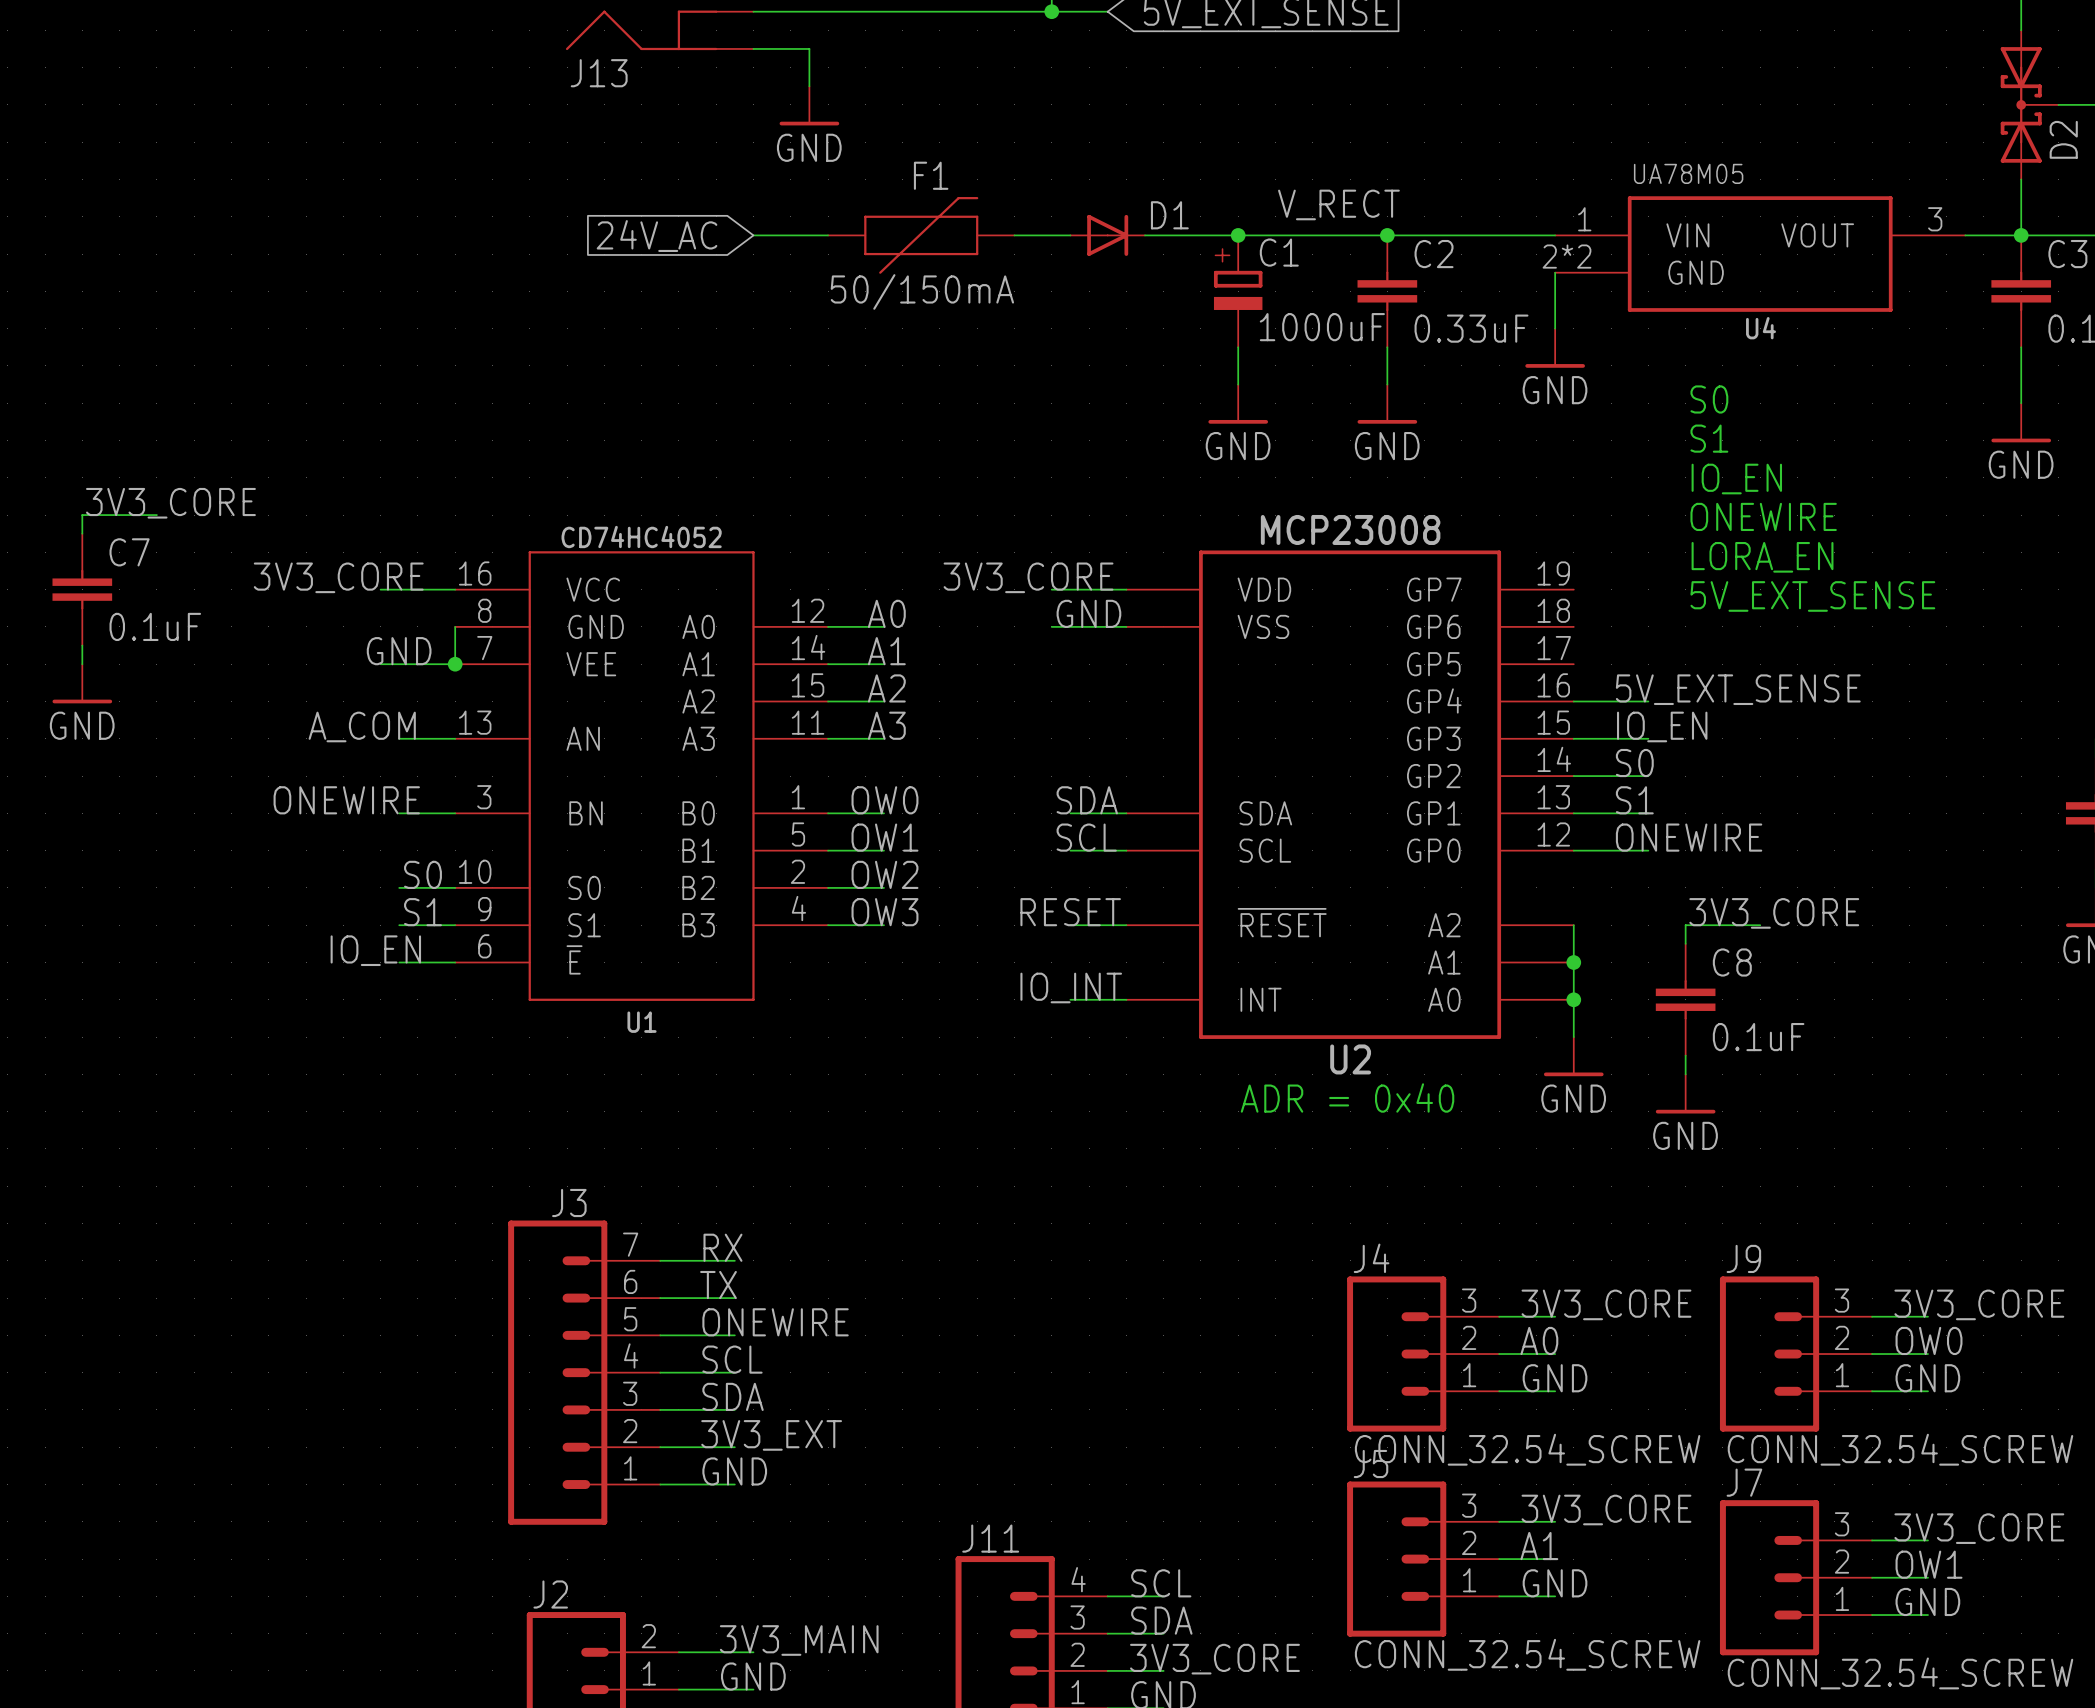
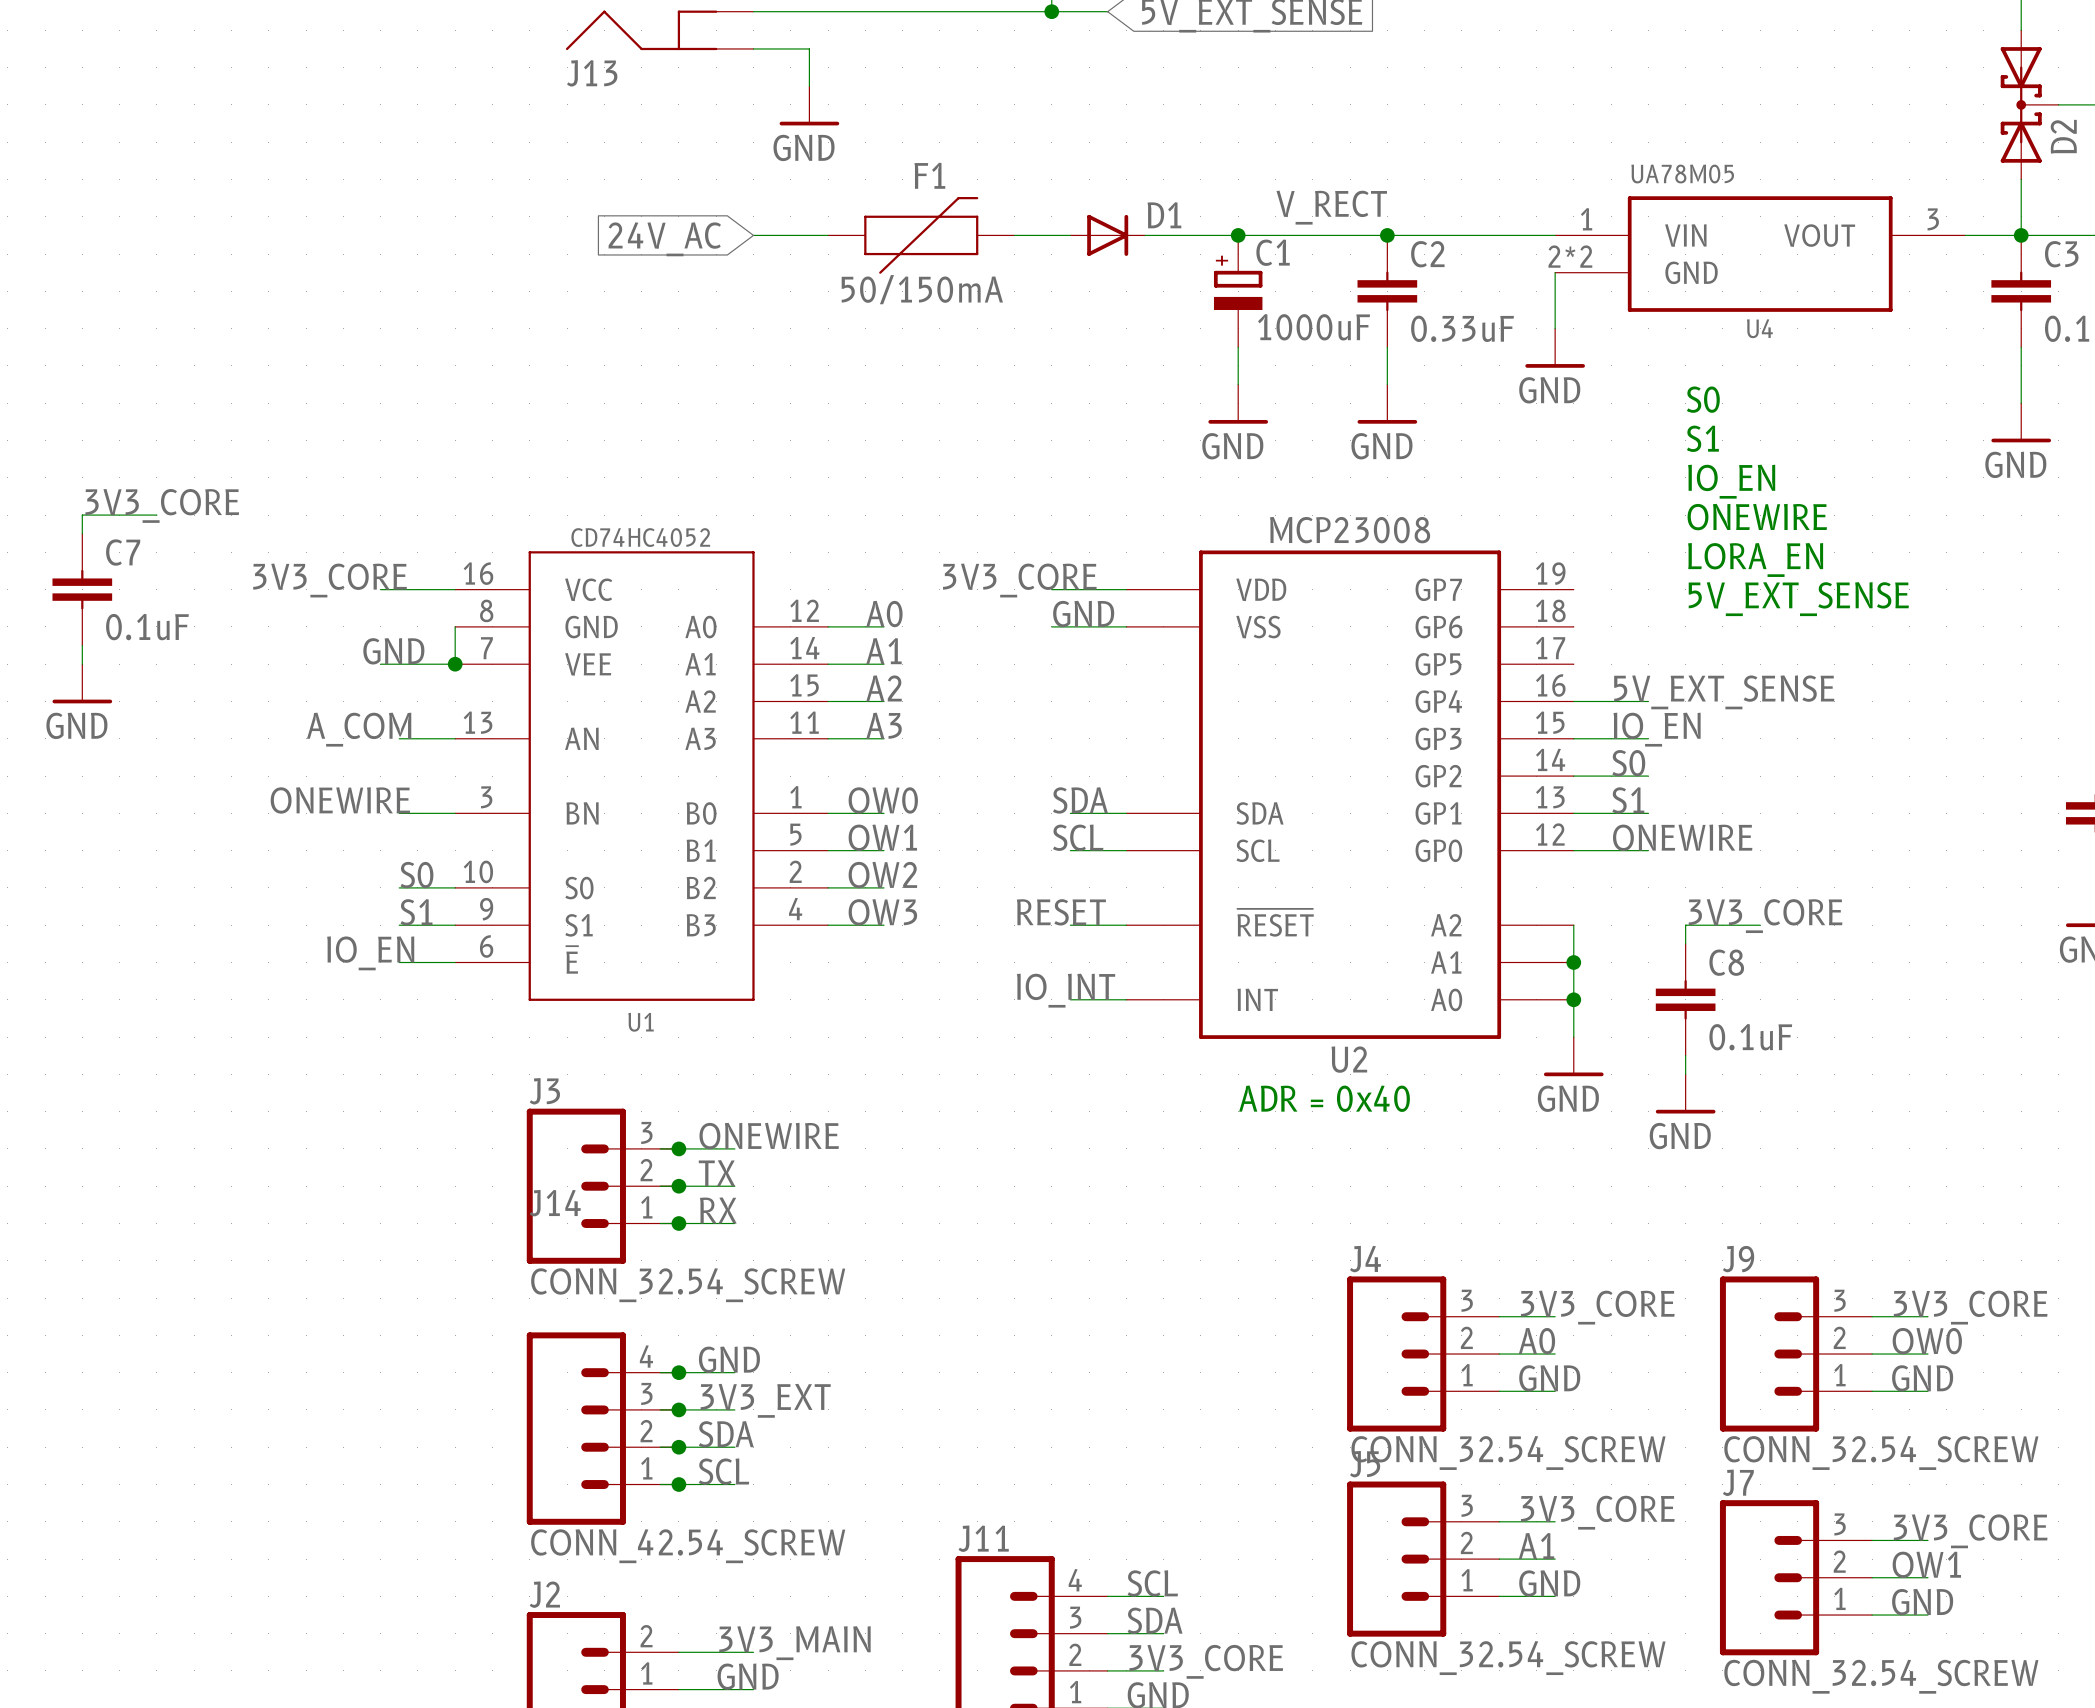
junction: none -> (678, 1148)
junction: none -> (678, 1186)
J3 name position: J3 (569, 1203) -> J3 (544, 1091)
J3 symbol: [508, 1220, 661, 1525] -> [526, 1108, 679, 1264]
junction: none -> (678, 1223)
label position: RX (722, 1247) -> RX (718, 1210)
wire: (660, 1260) (734, 1260) -> (660, 1148) (734, 1148)
J3 value: none -> CONN_32.54_SCREW (688, 1285)
label position: TX (718, 1285) -> TX (716, 1173)
wire: (660, 1298) (734, 1298) -> (660, 1186) (734, 1186)
label position: ONEWIRE (775, 1322) -> ONEWIRE (769, 1136)
wire: (660, 1335) (734, 1335) -> (660, 1223) (734, 1223)
label: SCL (732, 1359) -> GND (729, 1359)
junction: none -> (678, 1372)
label: SDA (733, 1396) -> 3V3_EXT (765, 1400)
junction: none -> (678, 1409)
J14: none -> CONN_42.54_SCREW (602, 1428)
label: 3V3_EXT (771, 1435) -> SDA (726, 1434)
junction: none -> (678, 1447)
label: GND (734, 1471) -> SCL (723, 1471)
junction: none -> (678, 1484)

